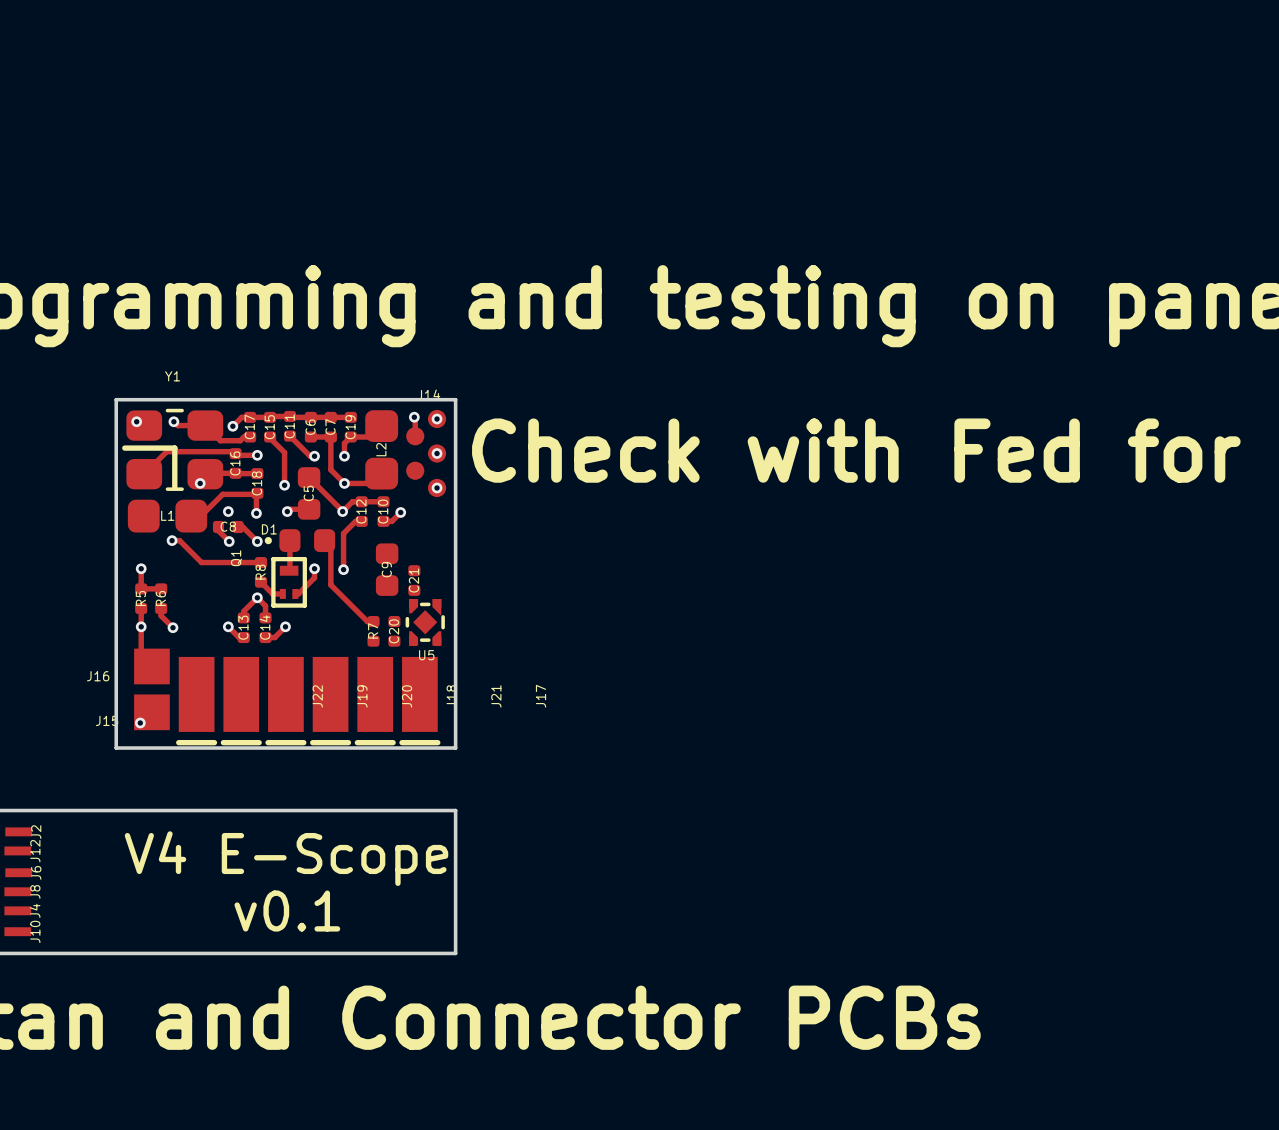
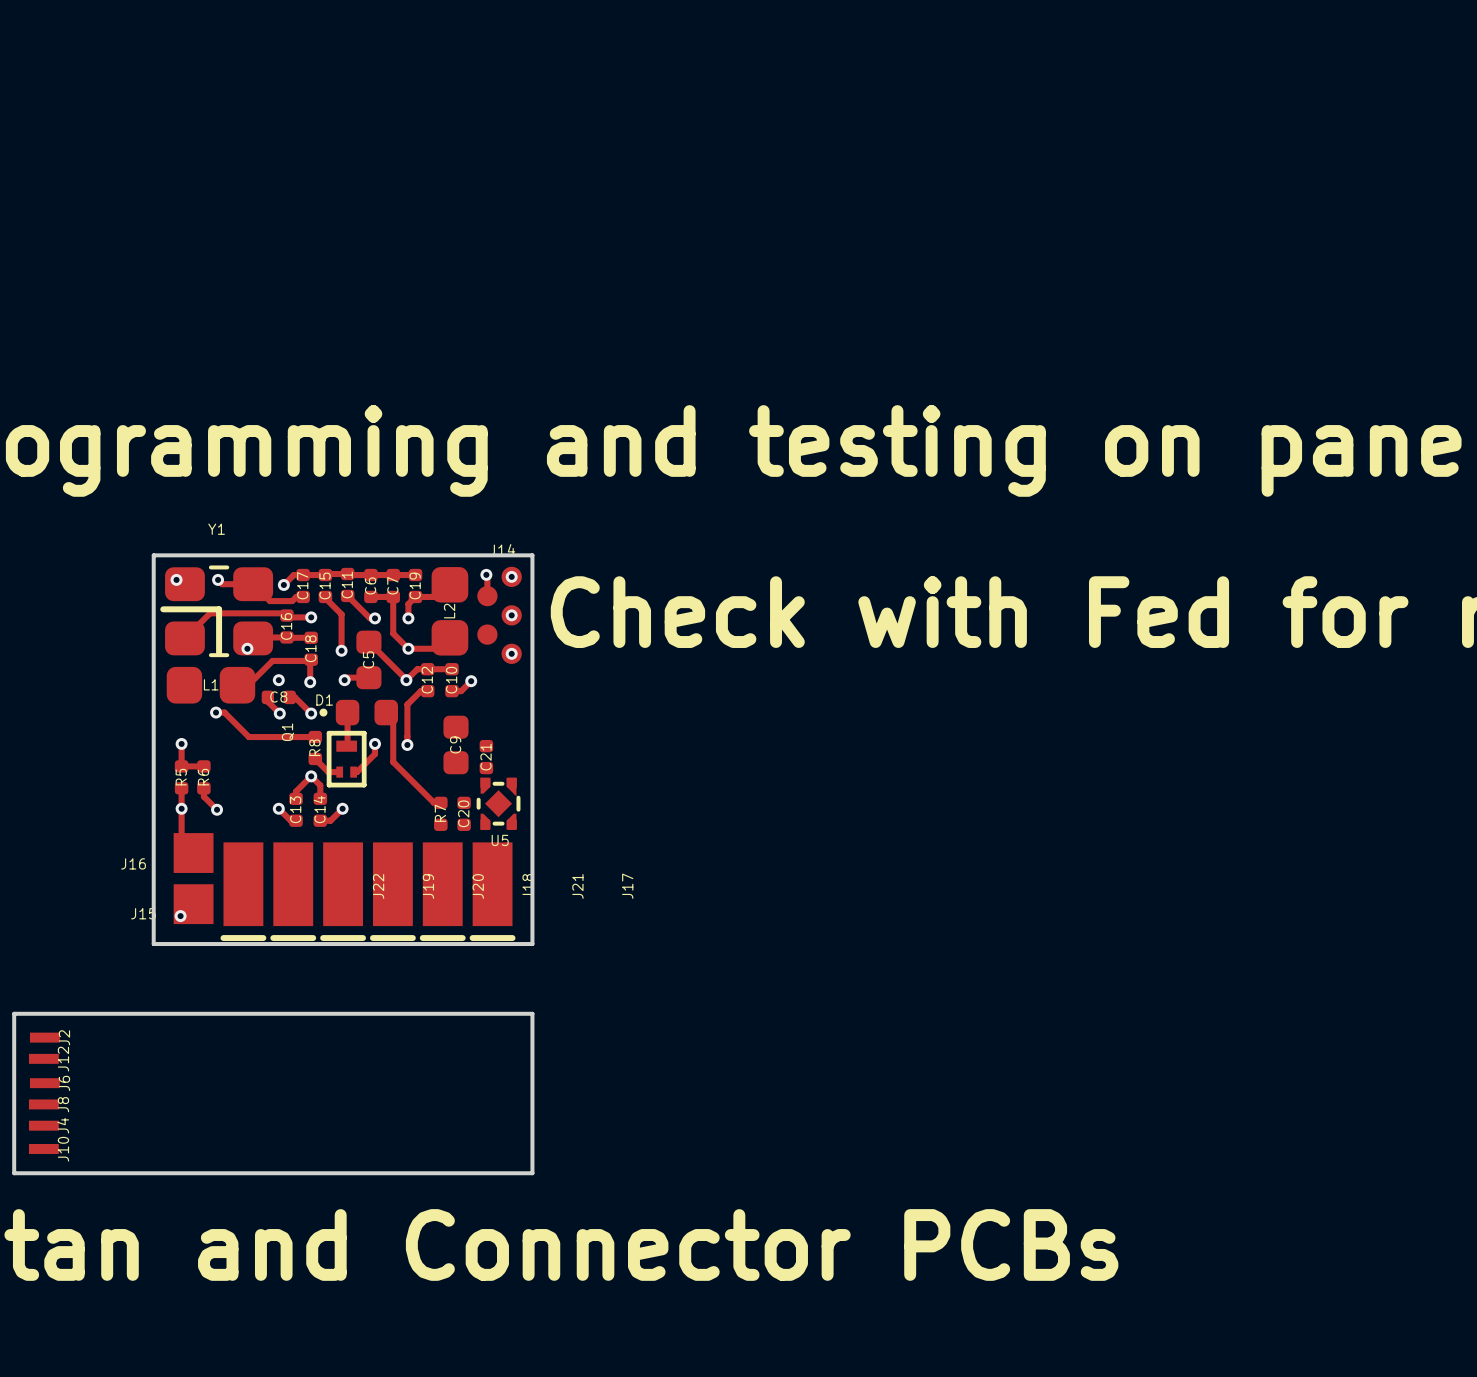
text: V4 E-Scope (286, 858) -> none
text: v0.1 (287, 911) -> none

